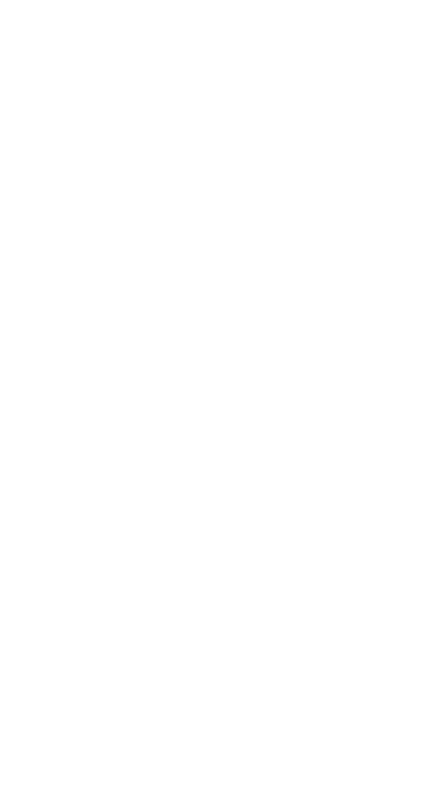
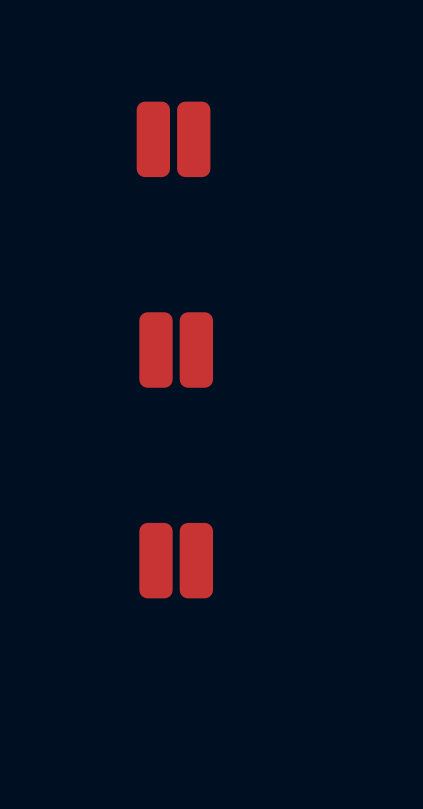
part: none -> (173, 139)
part: none -> (176, 350)
part: none -> (176, 560)

